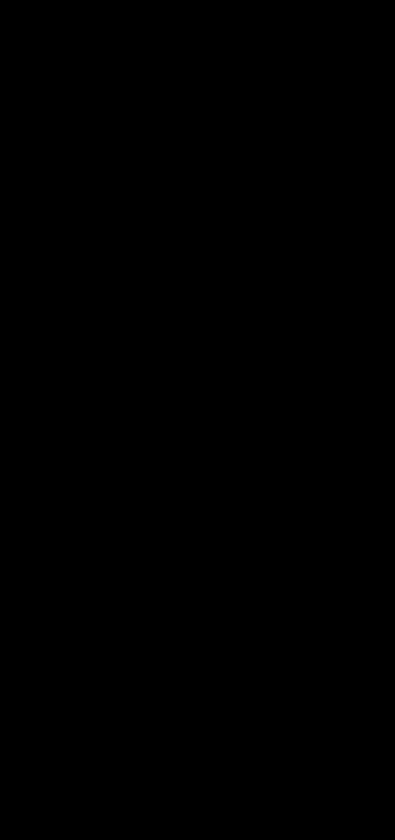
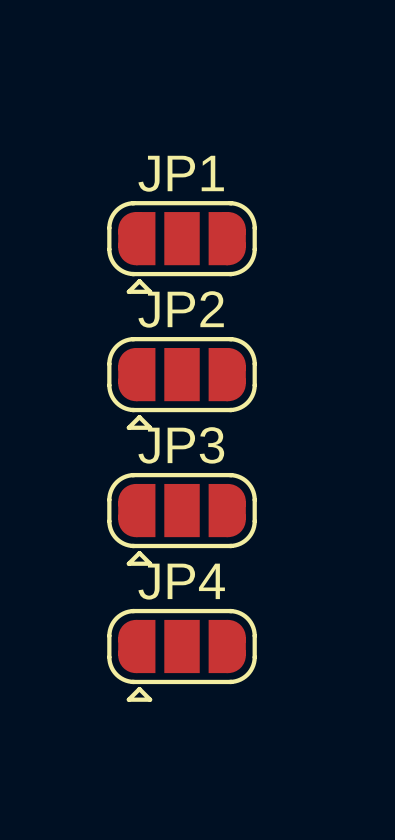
JP1: none -> (182, 247)
JP2: none -> (182, 383)
JP3: none -> (182, 519)
JP4: none -> (182, 655)

